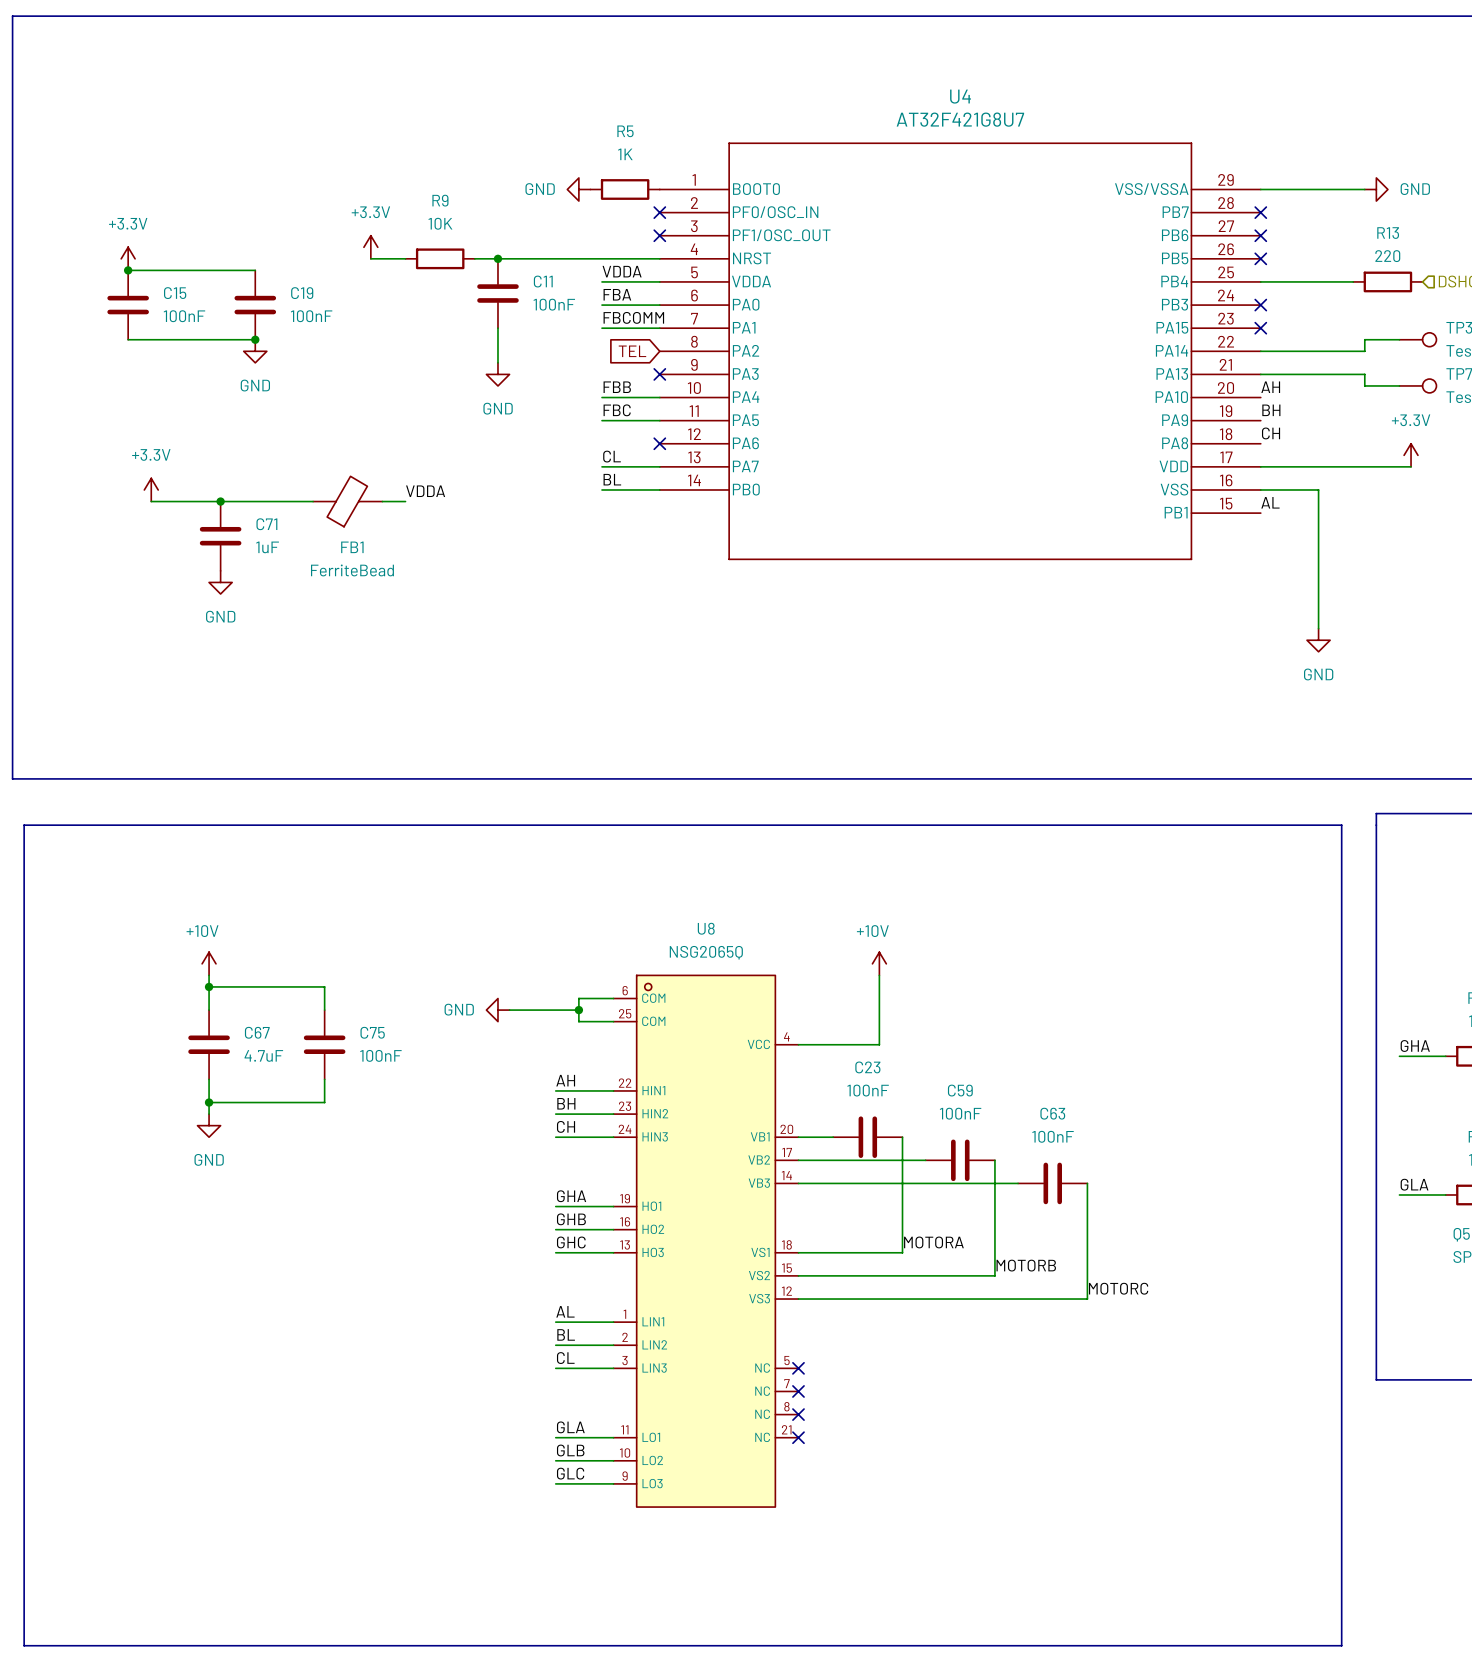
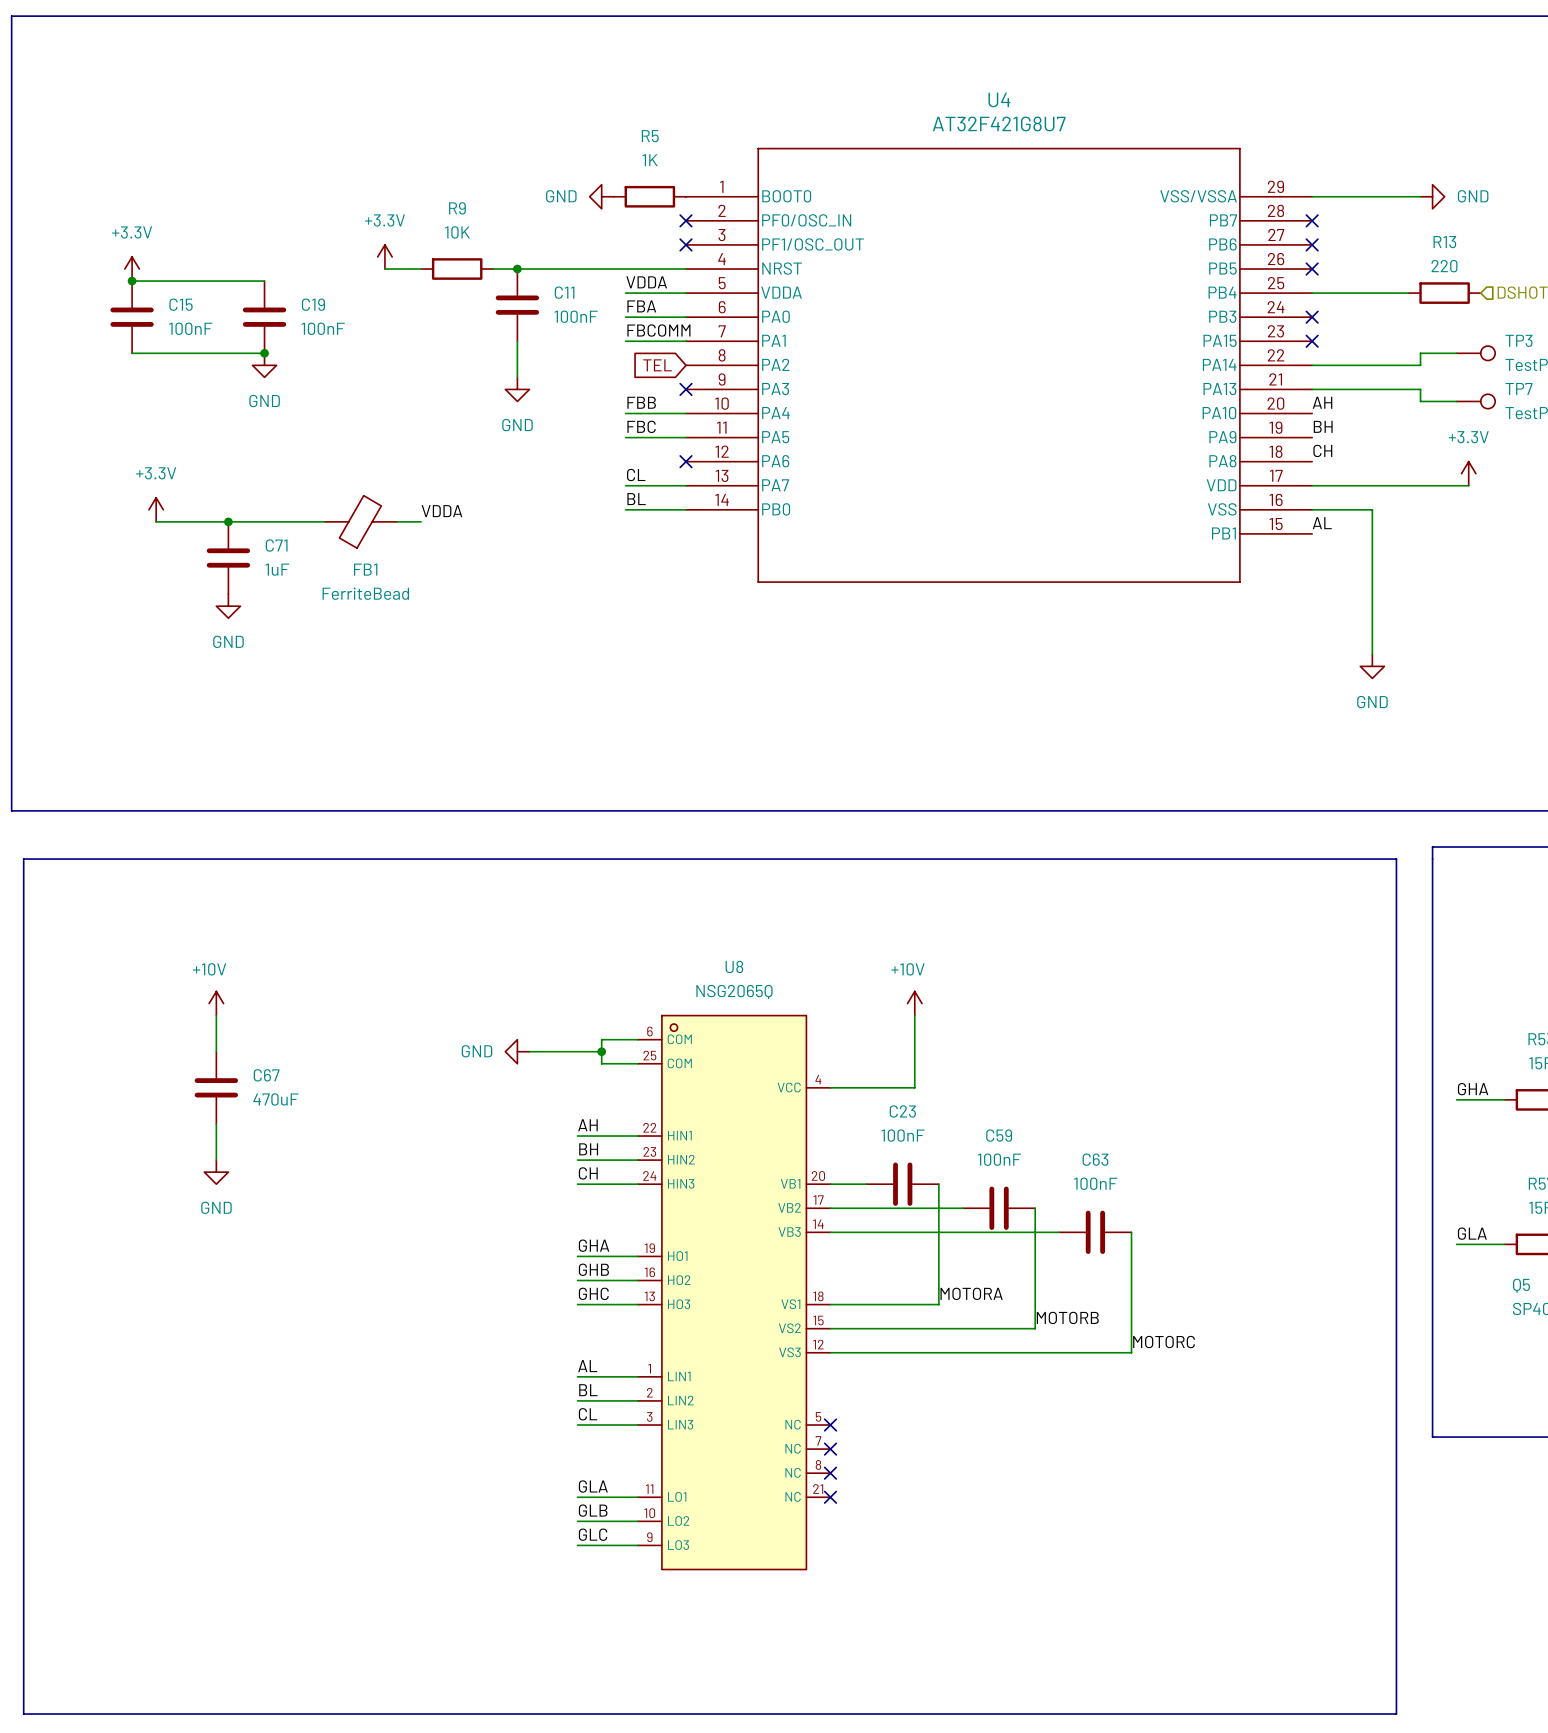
wire: (209, 986) (324, 986) (324, 1010) -> none
junction: (209, 986) -> none
C75: 100nF (324, 1044) -> none
C67 value: 4.7uF (263, 1055) -> 470uF (275, 1099)
wire: (324, 1079) (324, 1102) (209, 1102) -> none
junction: (209, 1102) -> none

